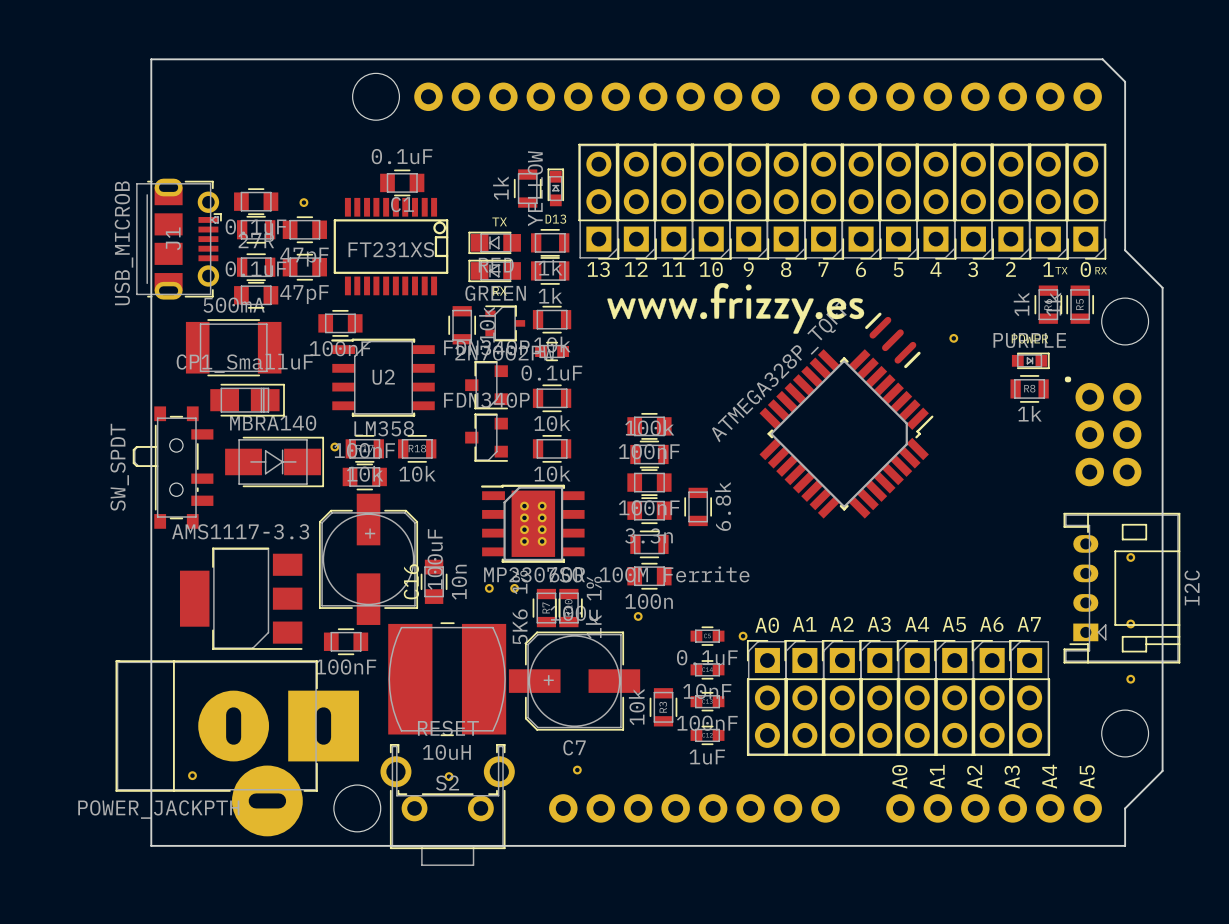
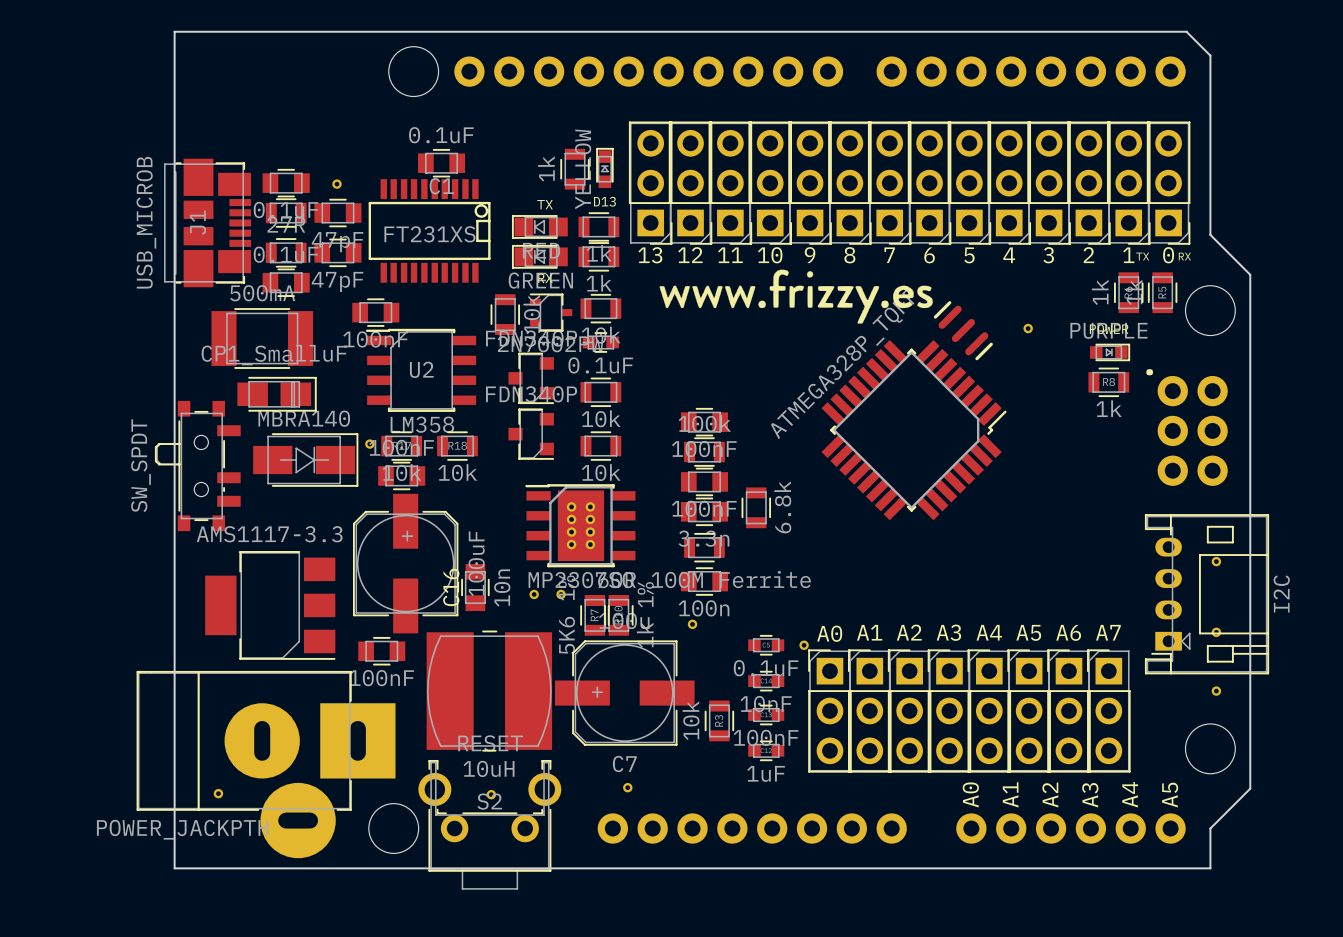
J1 footprint: [136, 178, 222, 300] -> [164, 158, 252, 288]

